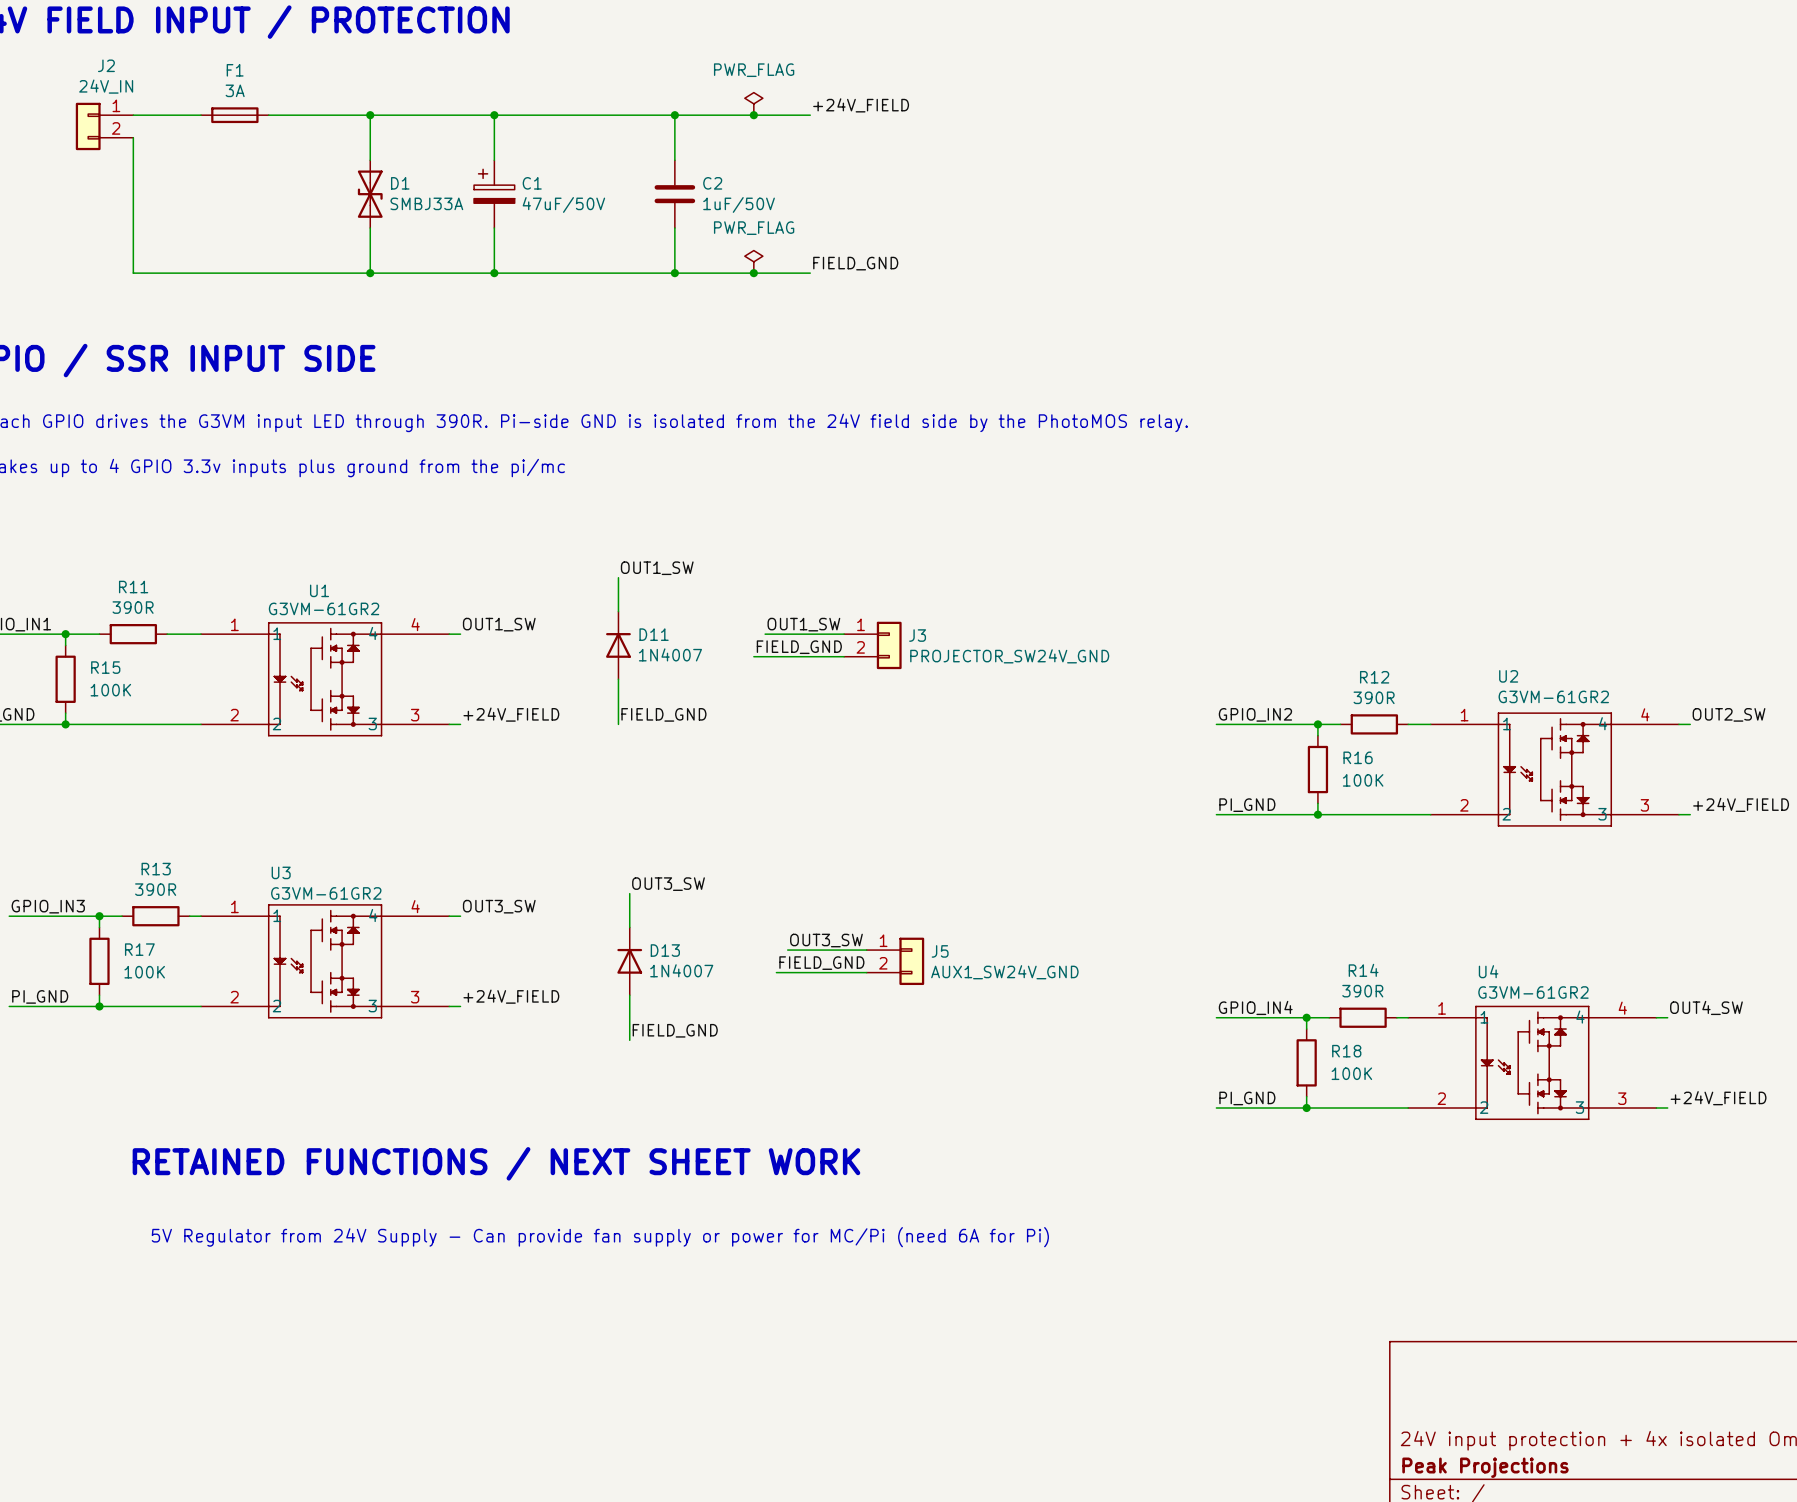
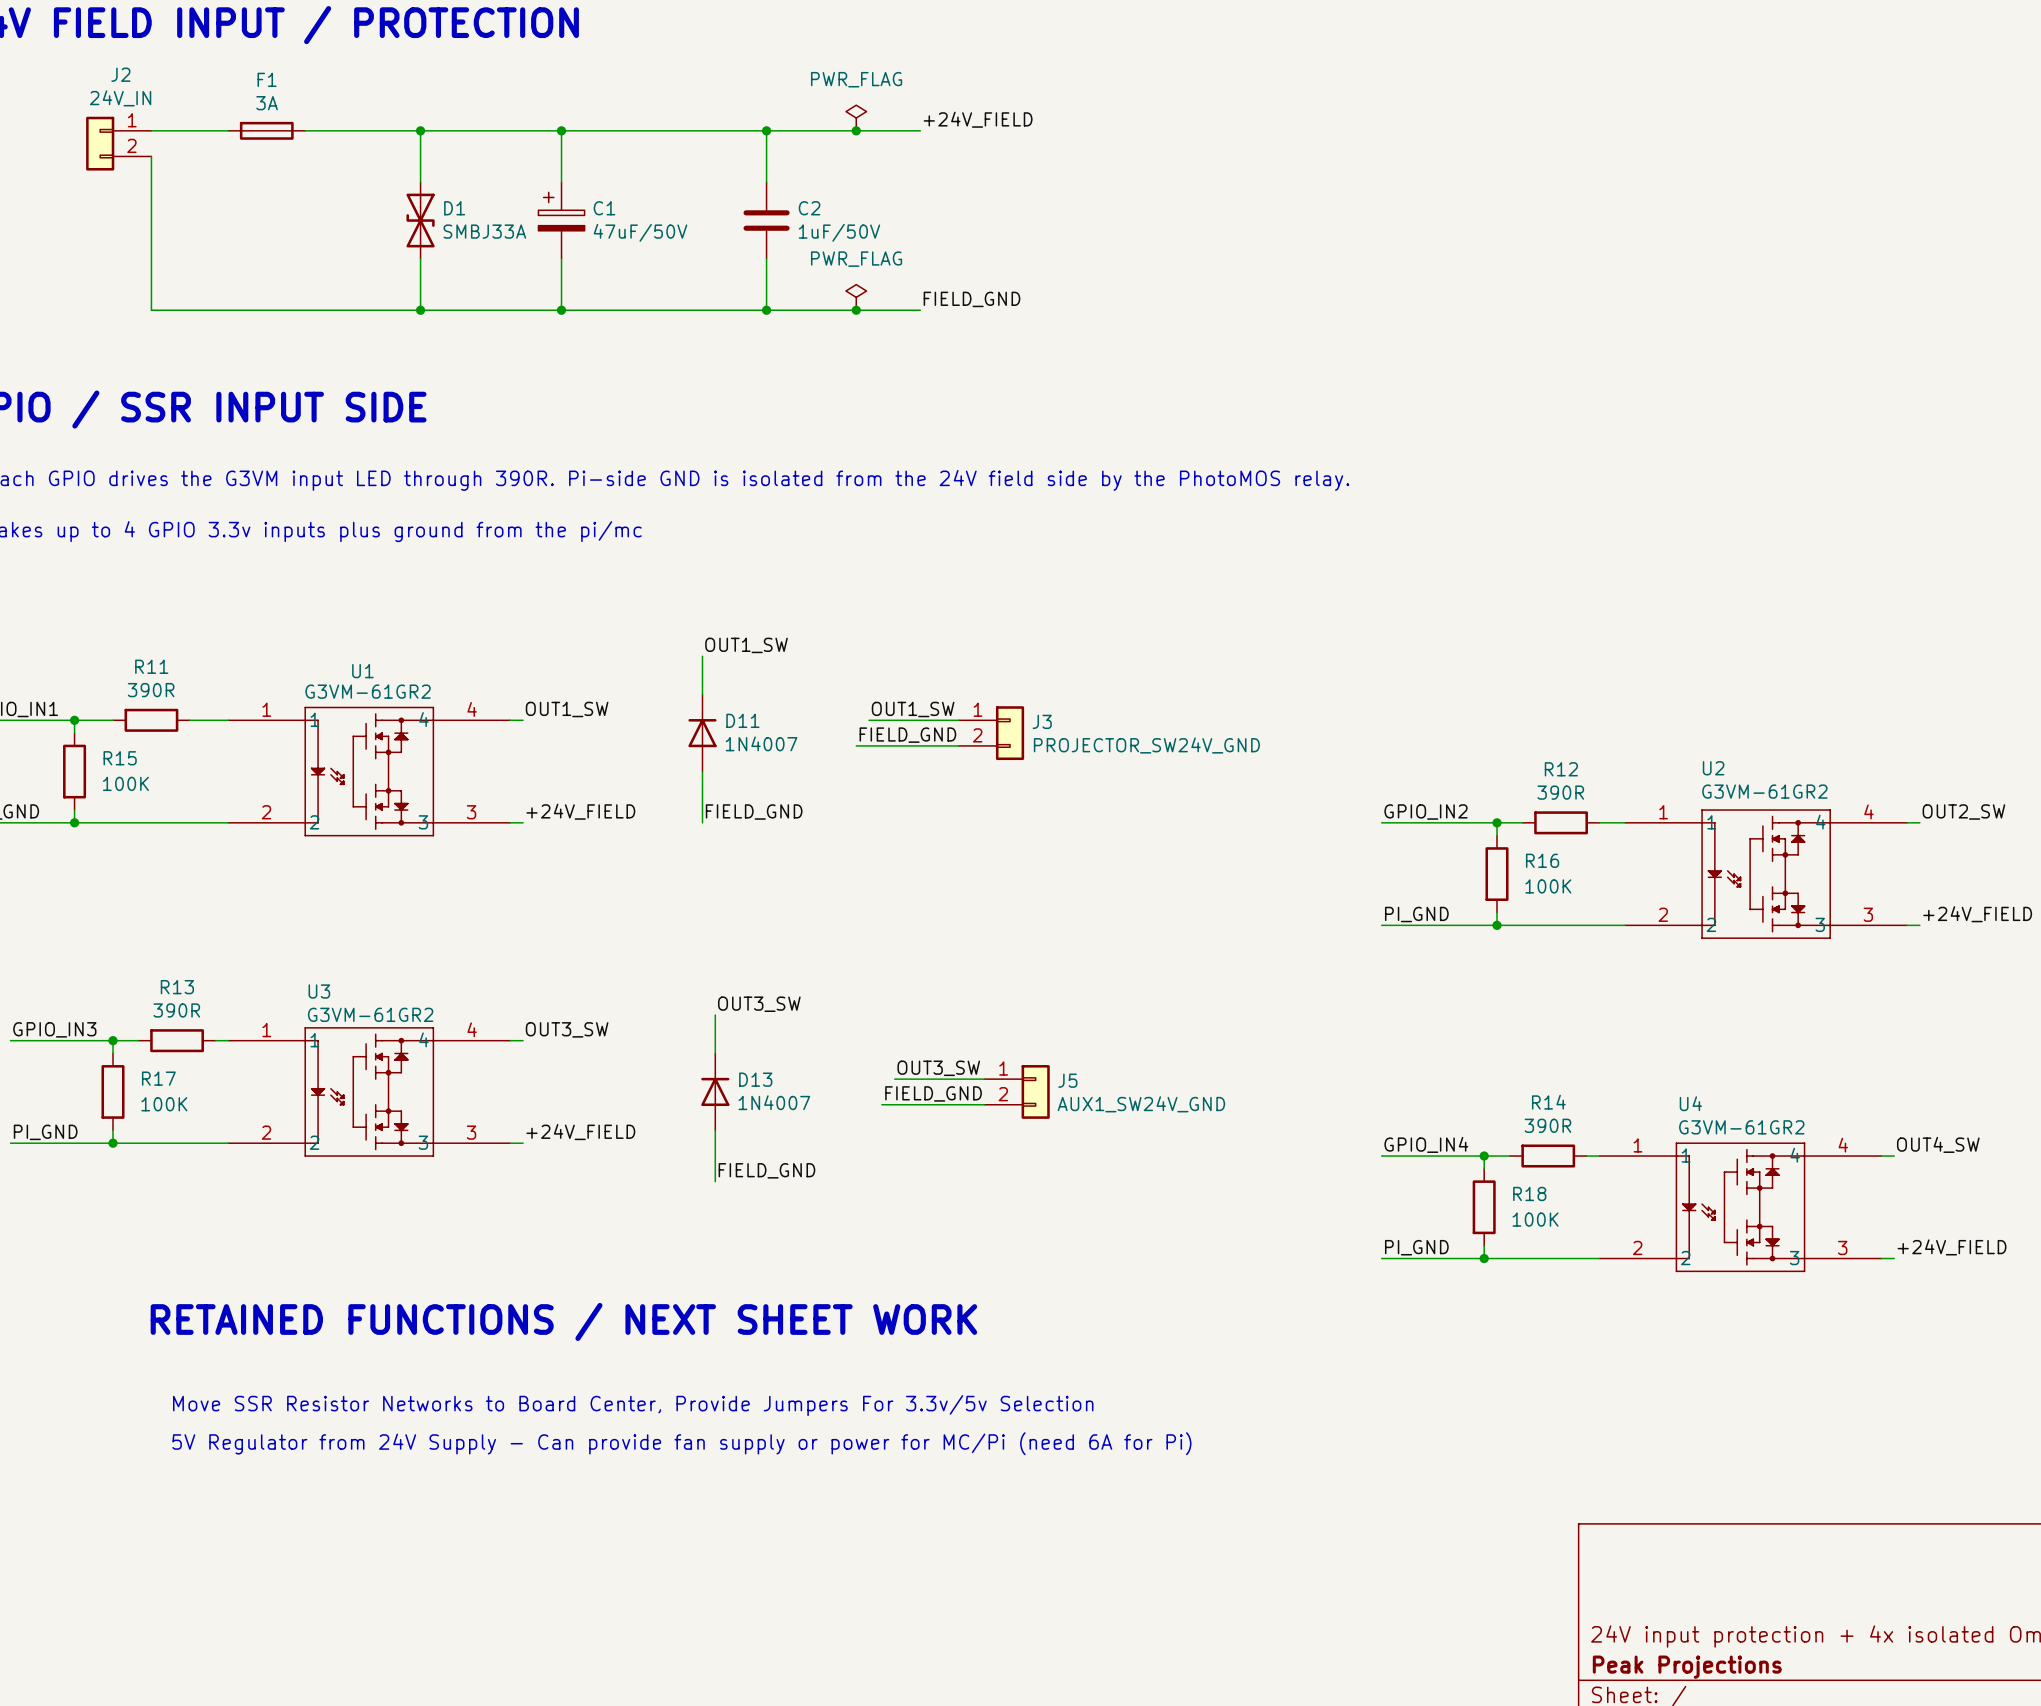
text: 5V Regulator from 24V Supply - Can provide fan supply or power for MC/Pi (need 6A for Pi) (600, 1237) -> Move SSR Resistor Networks to Board Center, Provide Jumpers For 3.3v/5v Selection (633, 1405)
text: none -> 5V Regulator from 24V Supply - Can provide fan supply or power for MC/Pi (need 6A for Pi) (681, 1443)

